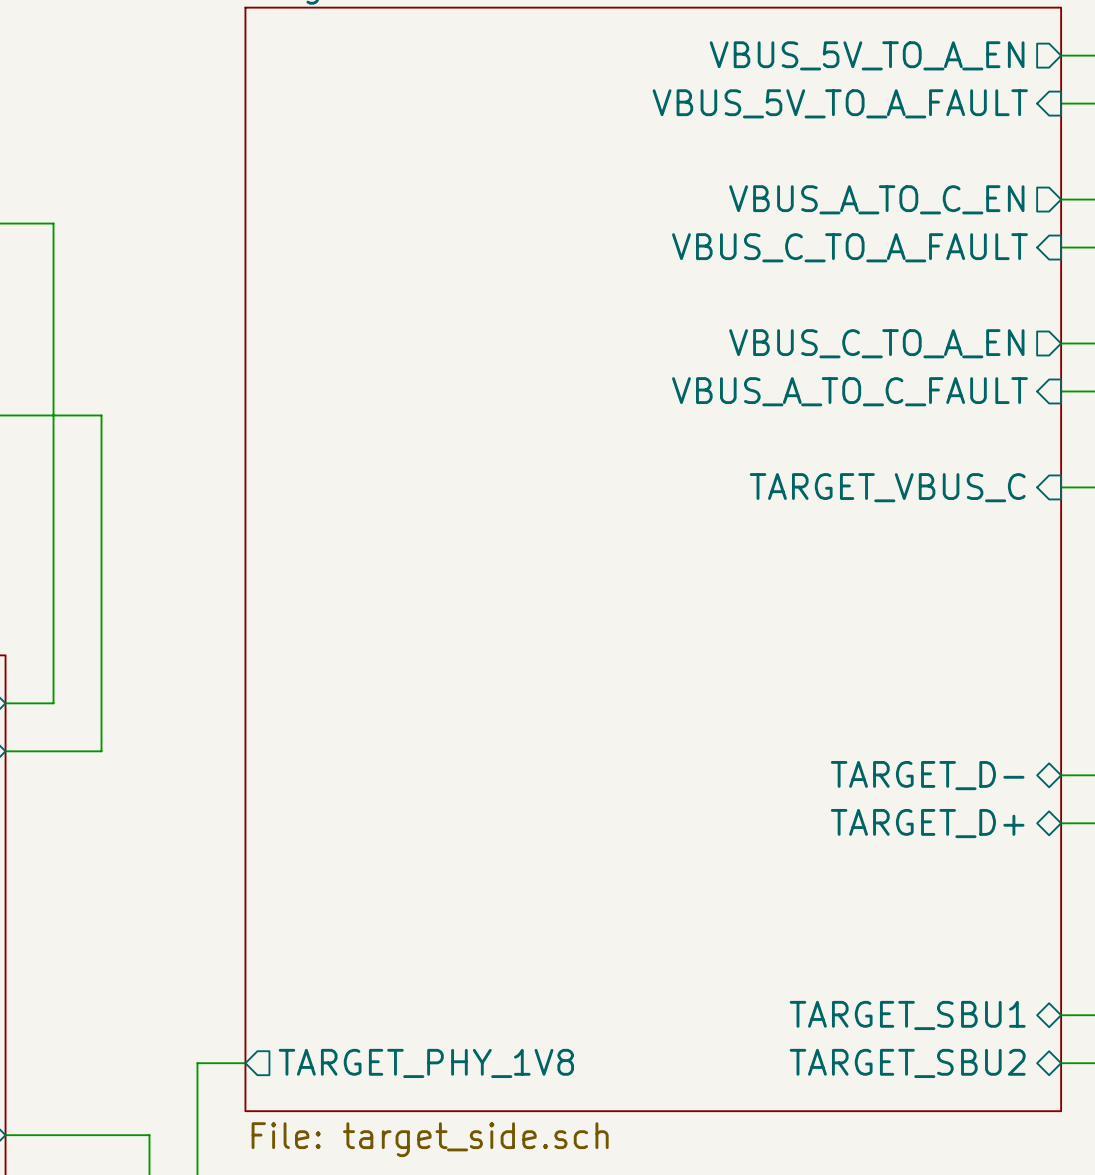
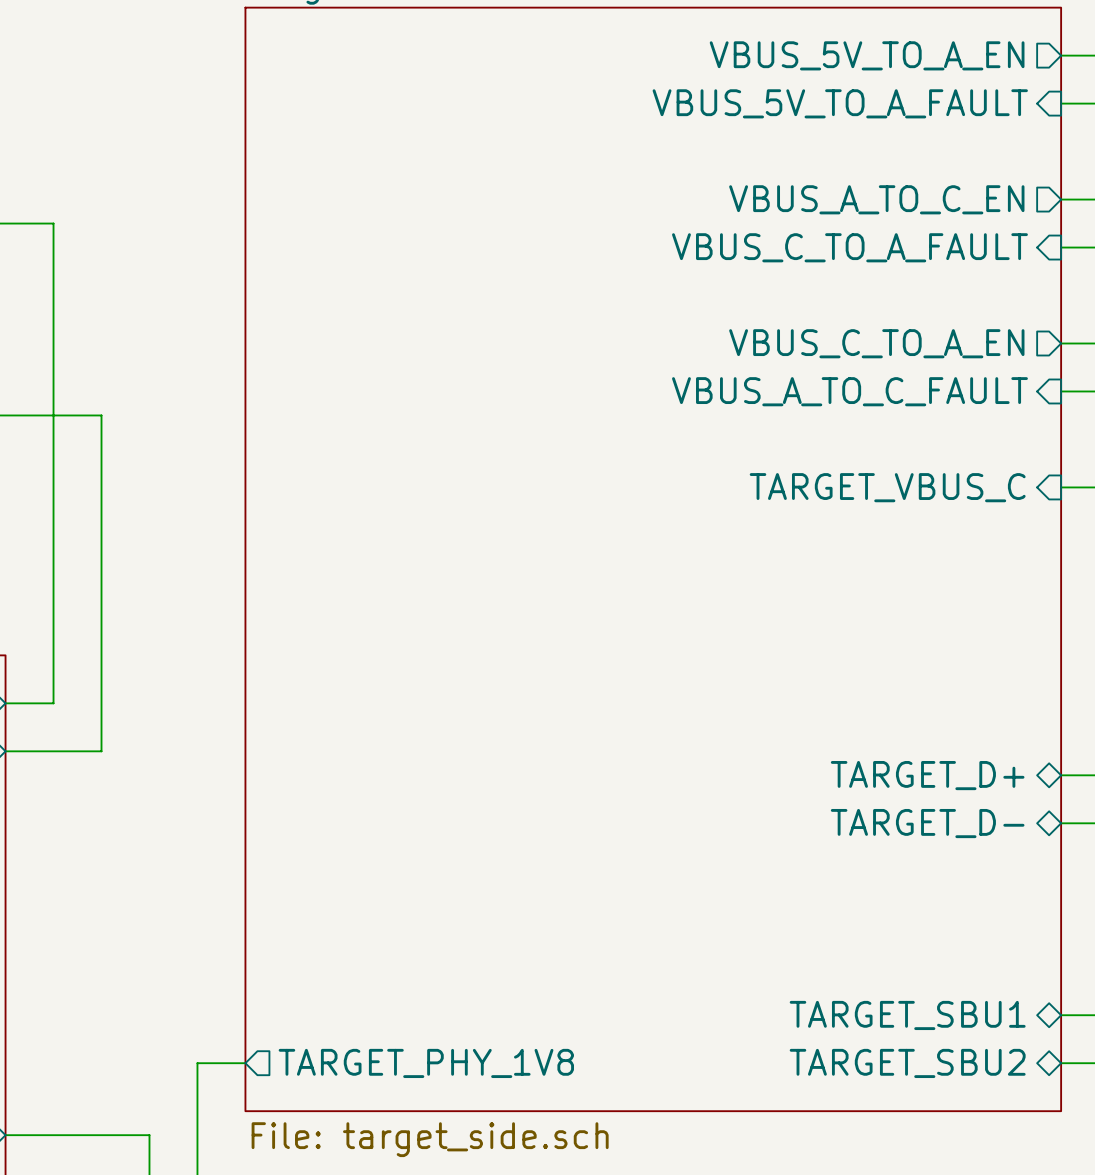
sheet pin: TARGET_D- (927, 775) -> TARGET_D+ (927, 775)
sheet pin: TARGET_D+ (927, 823) -> TARGET_D- (927, 823)

